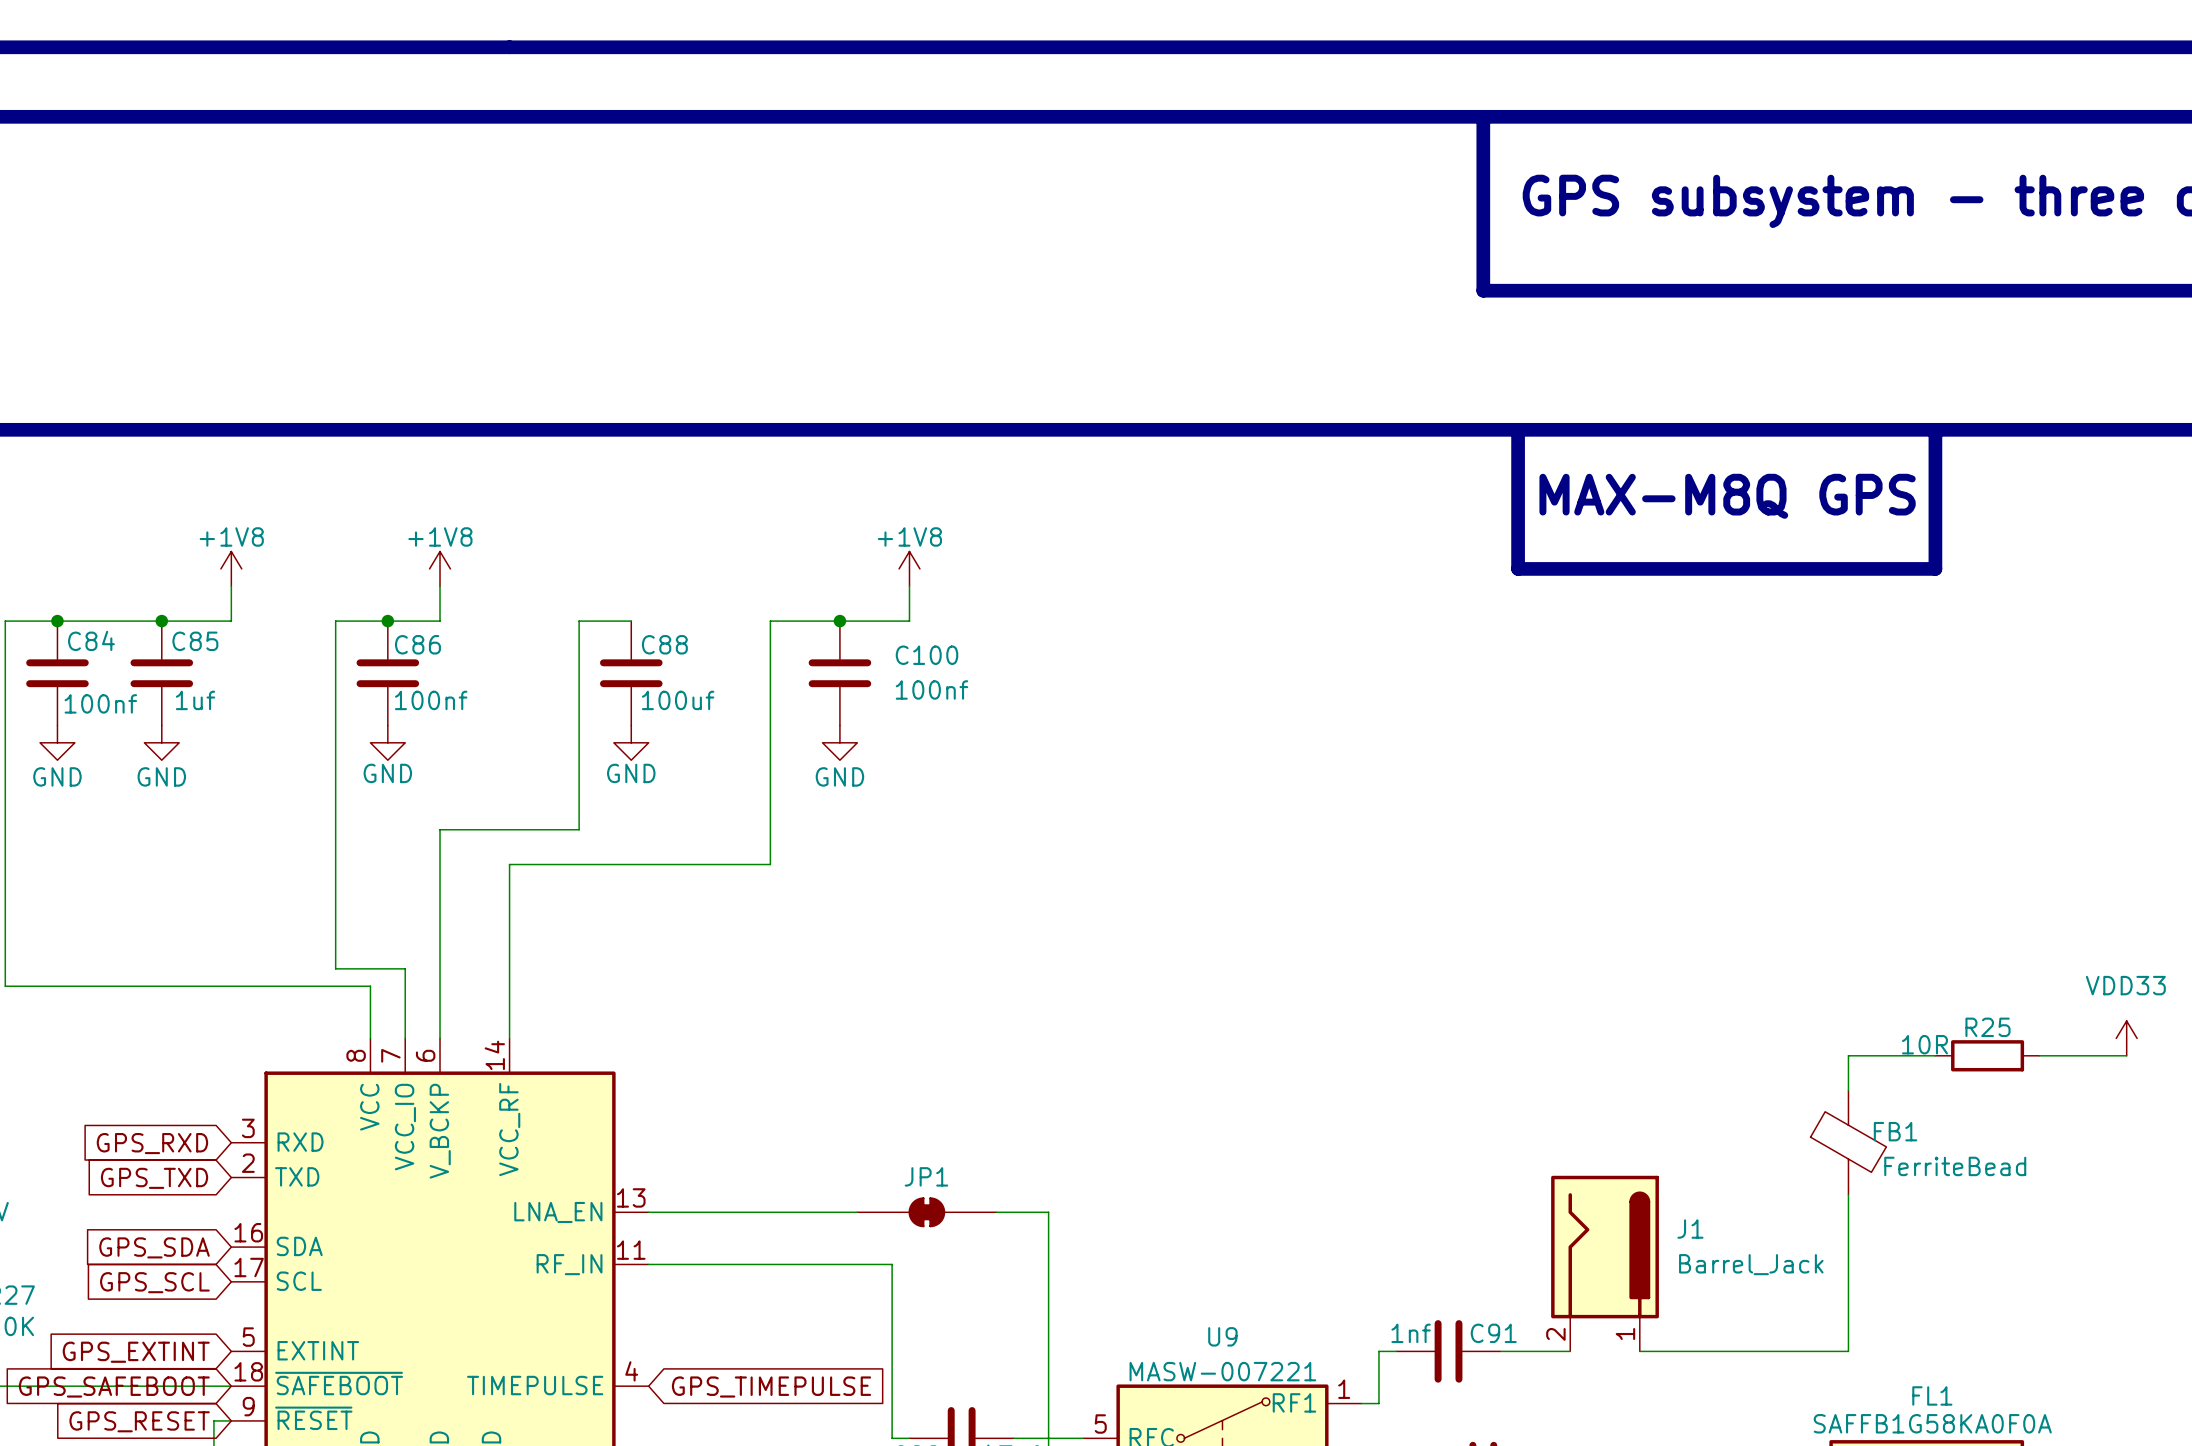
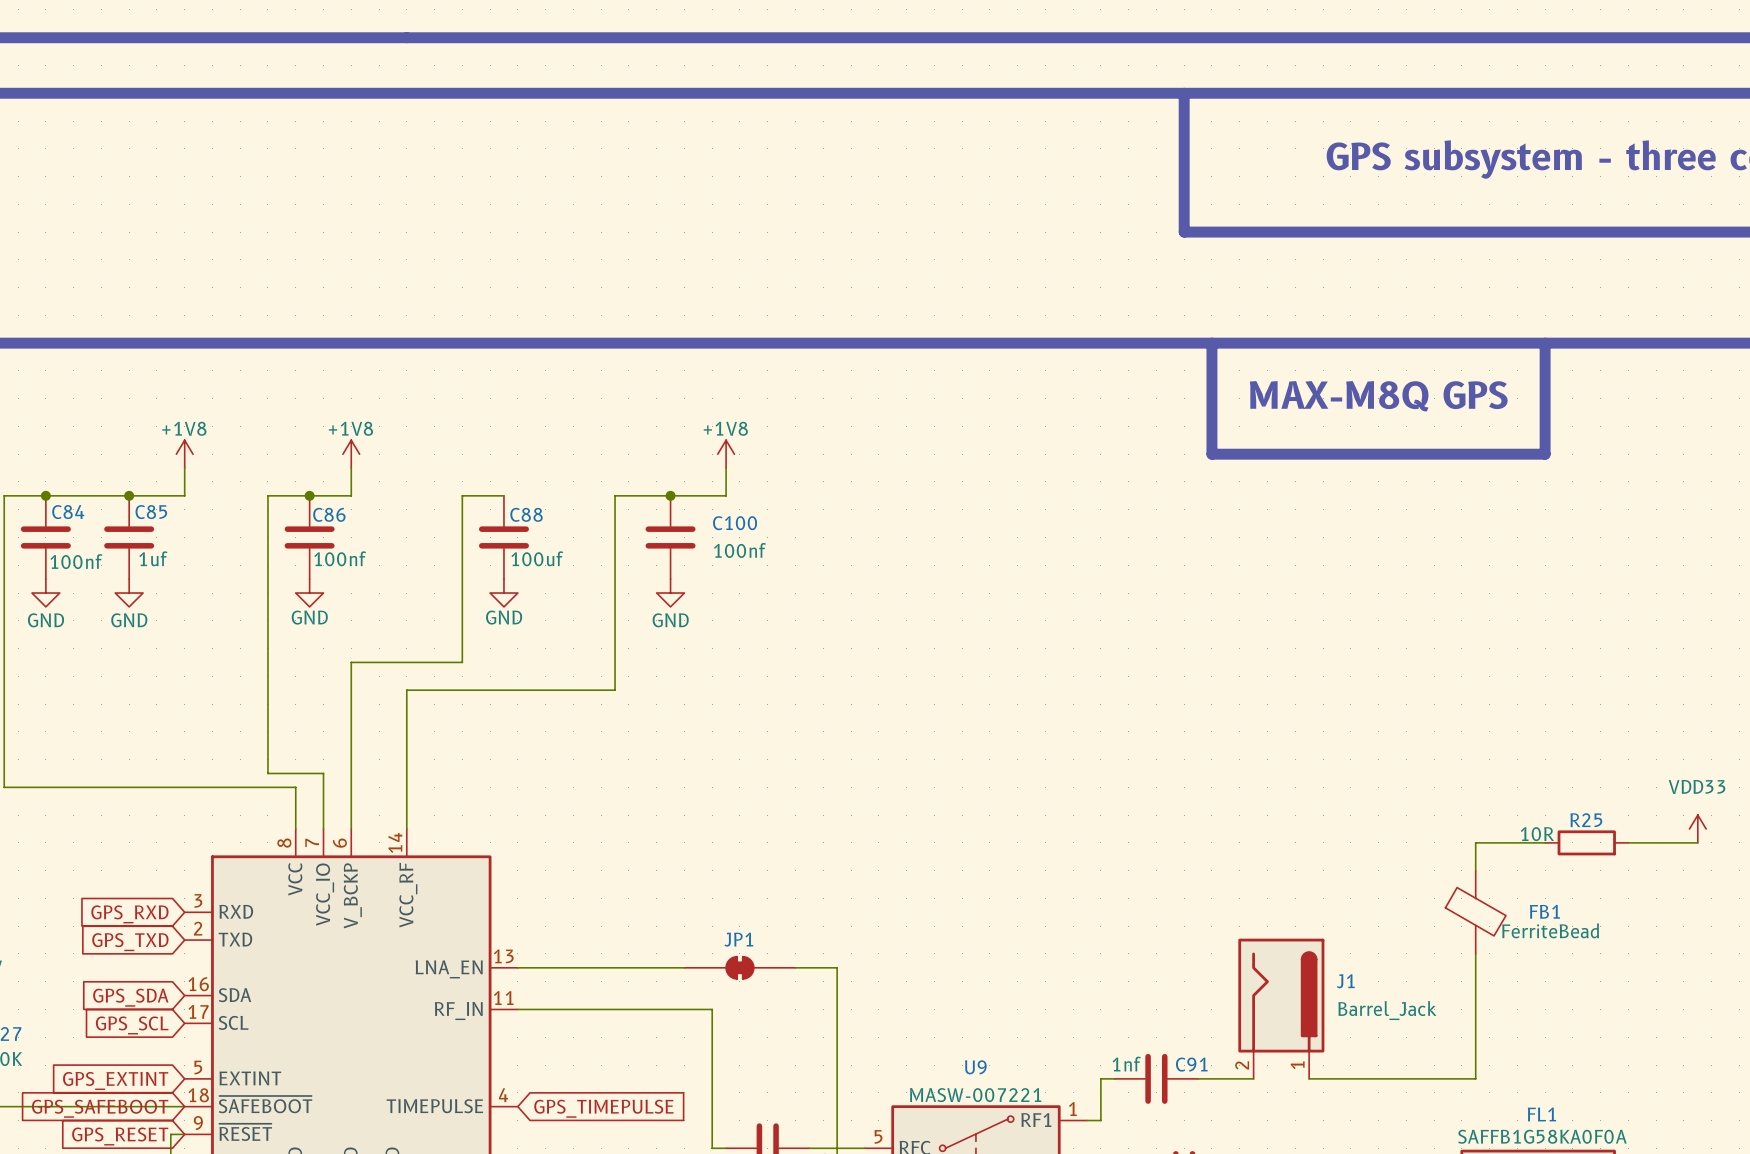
FB1 name position: FB1 (1895, 1131) -> FB1 (1544, 911)

